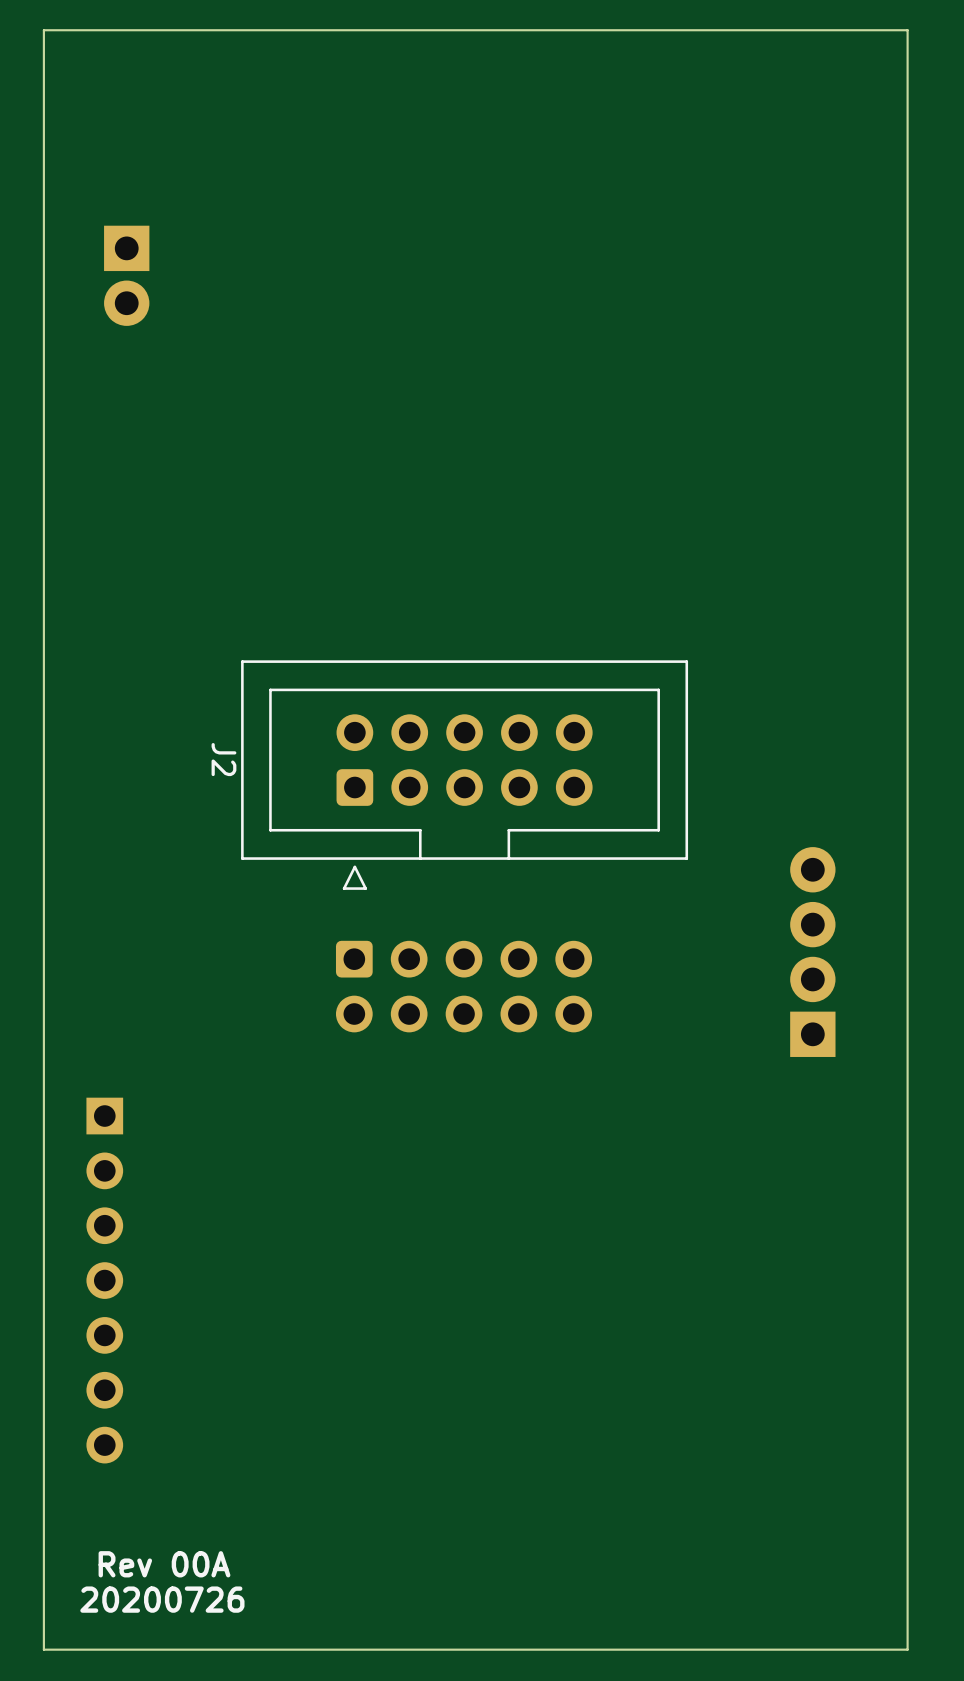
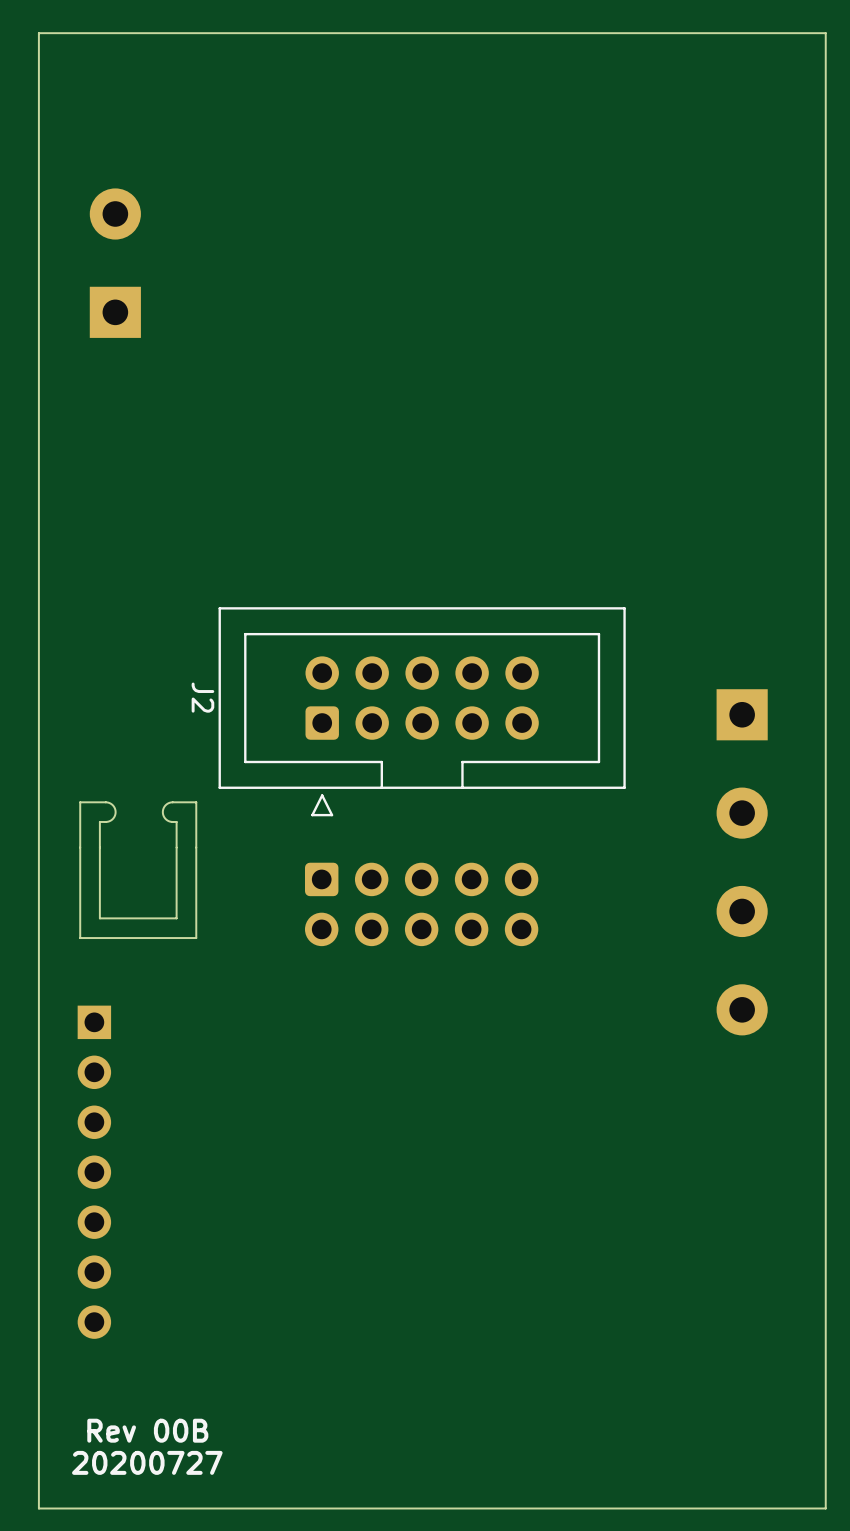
part footprint: [104, 225, 150, 326] -> [89, 188, 141, 338]
part footprint: [790, 847, 836, 1057] -> [716, 689, 768, 1036]
board edge: none -> (196, 802) (170, 802) (164, 806) (162, 810) (166, 819) (176, 821) (176, 918) (99, 918) (99, 821) (111, 819) (115, 810) (113, 806) (108, 802) (80, 802) (80, 938) (196, 938) (196, 802)
text: Rev 00A (164, 1564) -> Rev 00B (147, 1430)
text: 20200726 (162, 1599) -> 20200727 (147, 1462)

